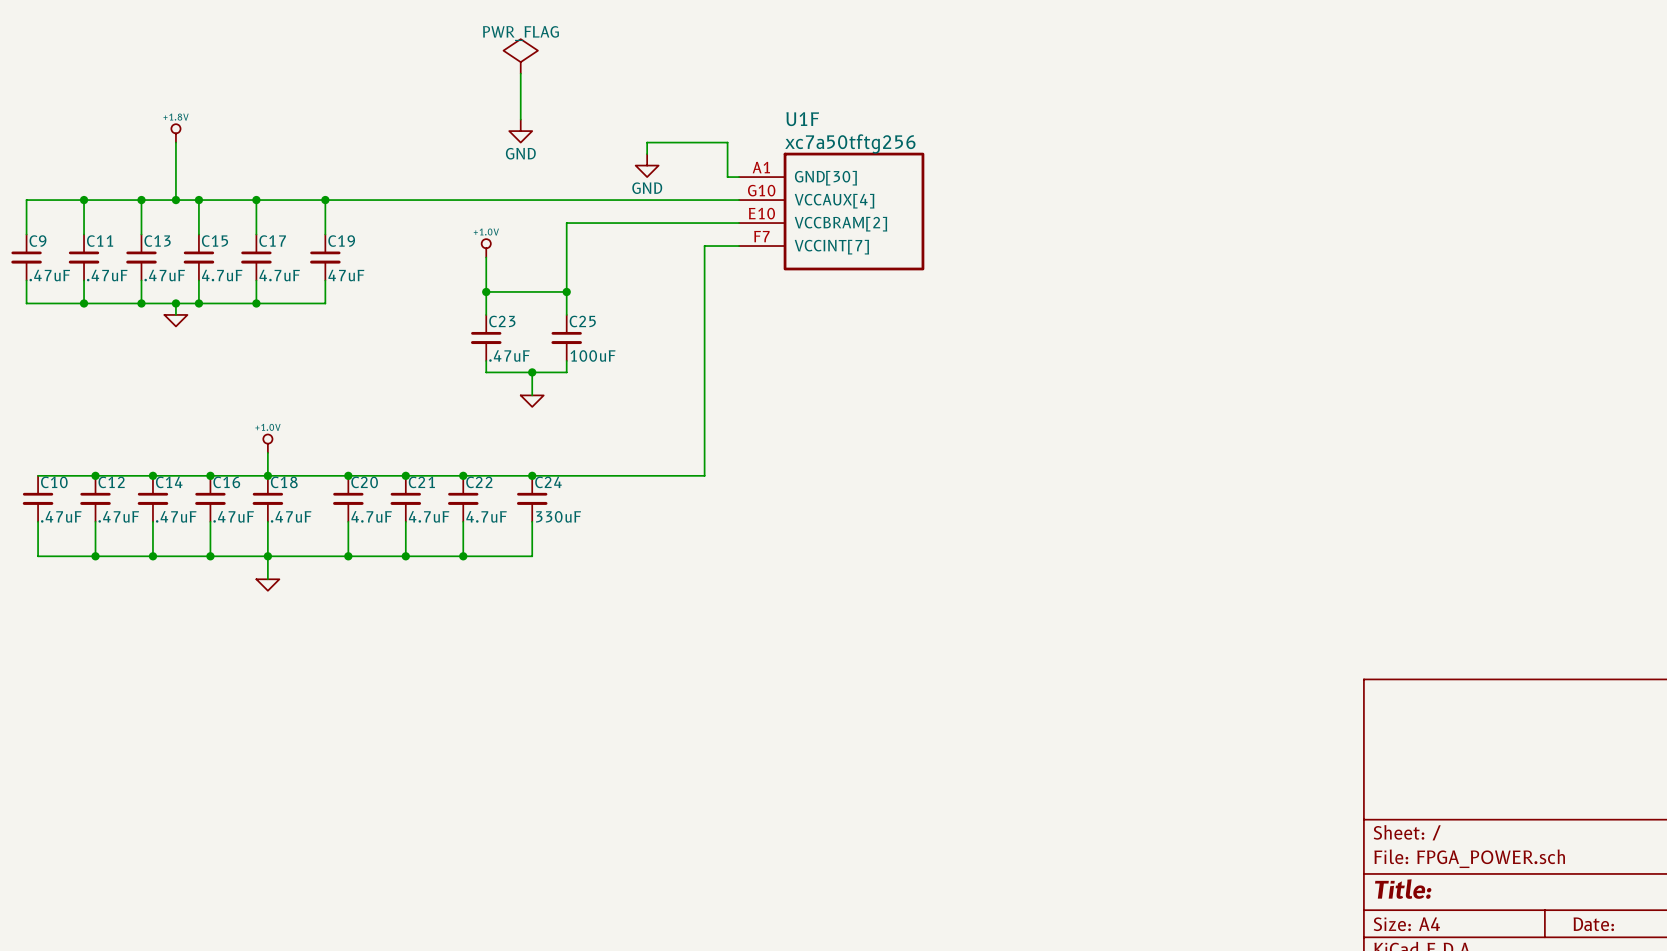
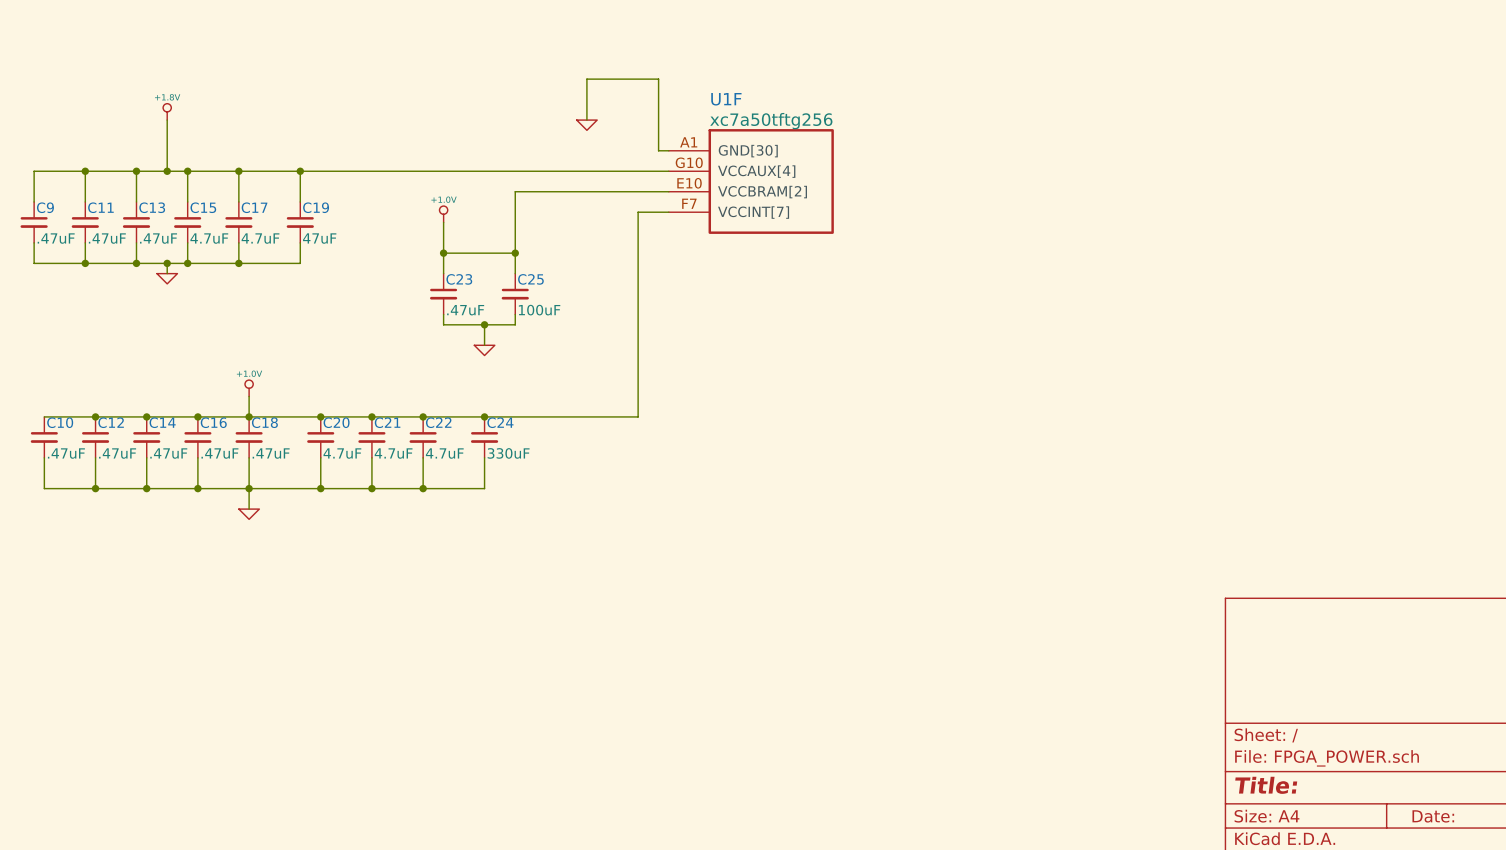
power symbol: PWR_FLAG (520, 56) -> none
wire: (520, 73) (520, 119) -> none
power symbol: GND (520, 131) -> none
wire: (727, 142) (647, 142) (647, 154) -> (658, 120) (658, 79) (586, 79) (586, 120)
power symbol: none -> (586, 125)
power symbol: GND (647, 165) -> none

